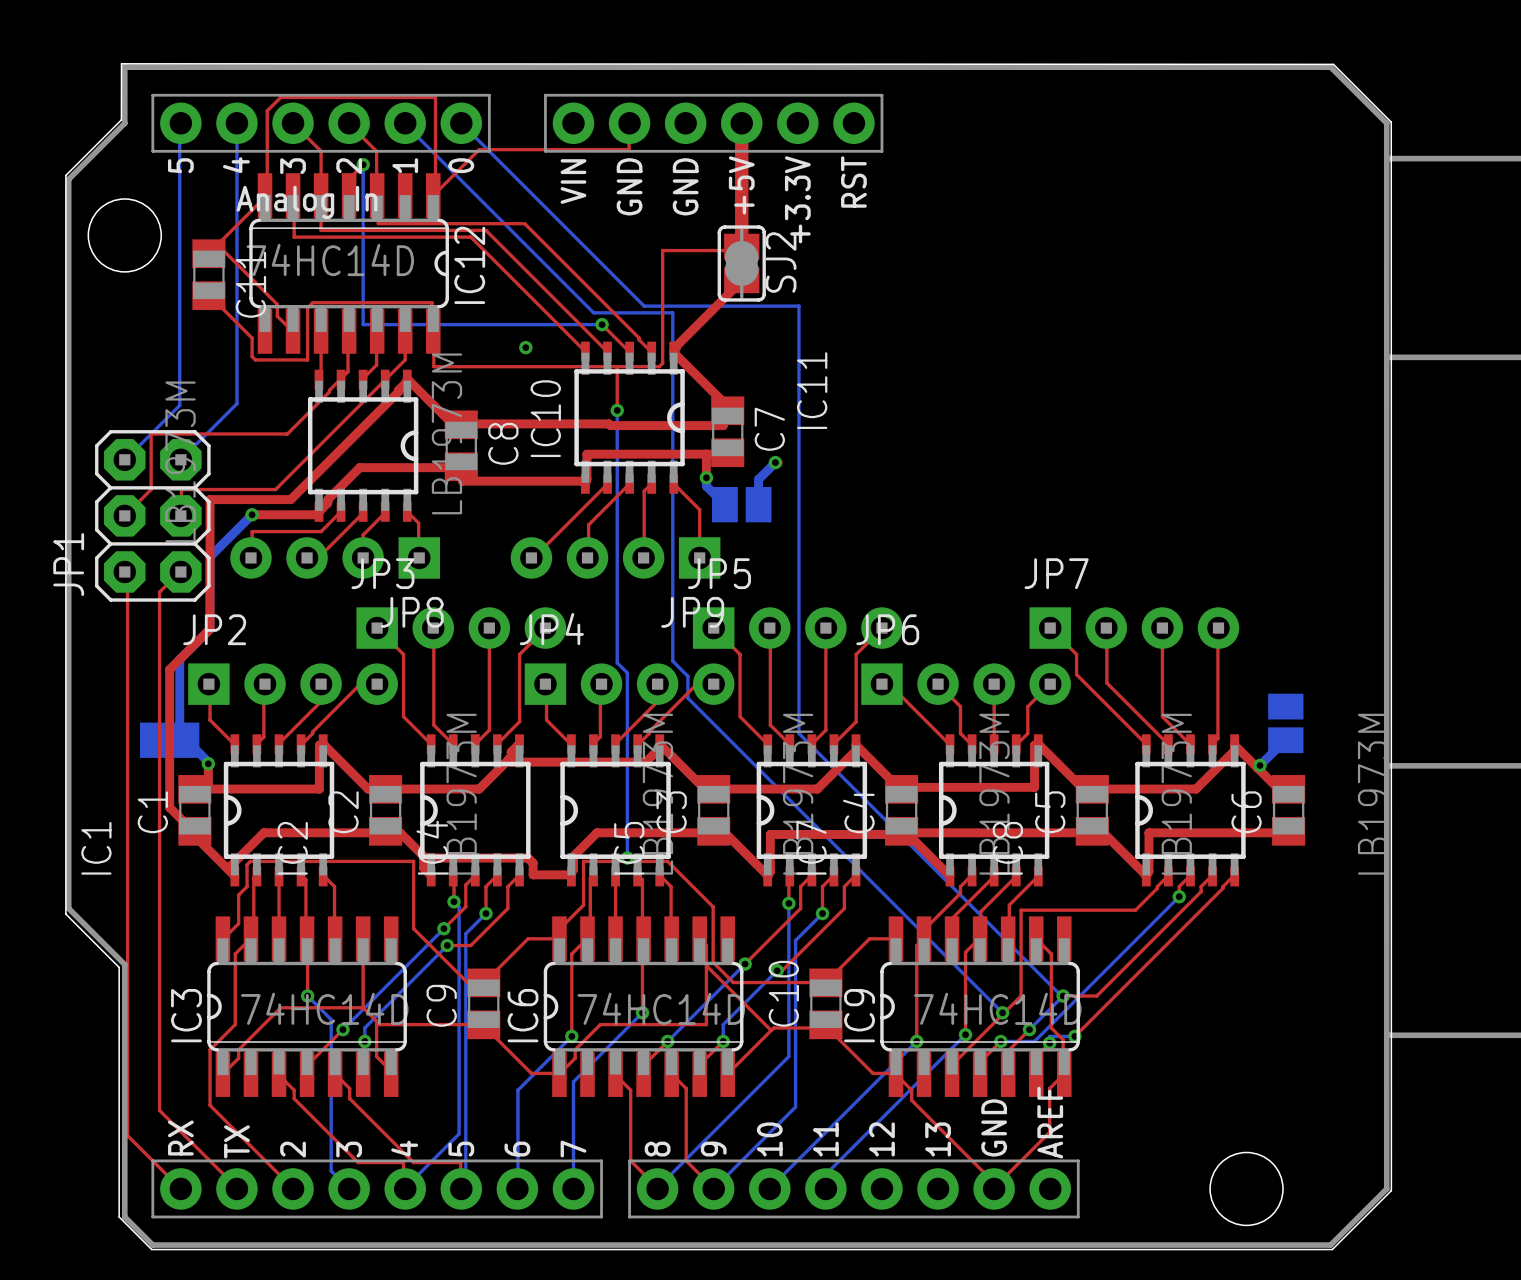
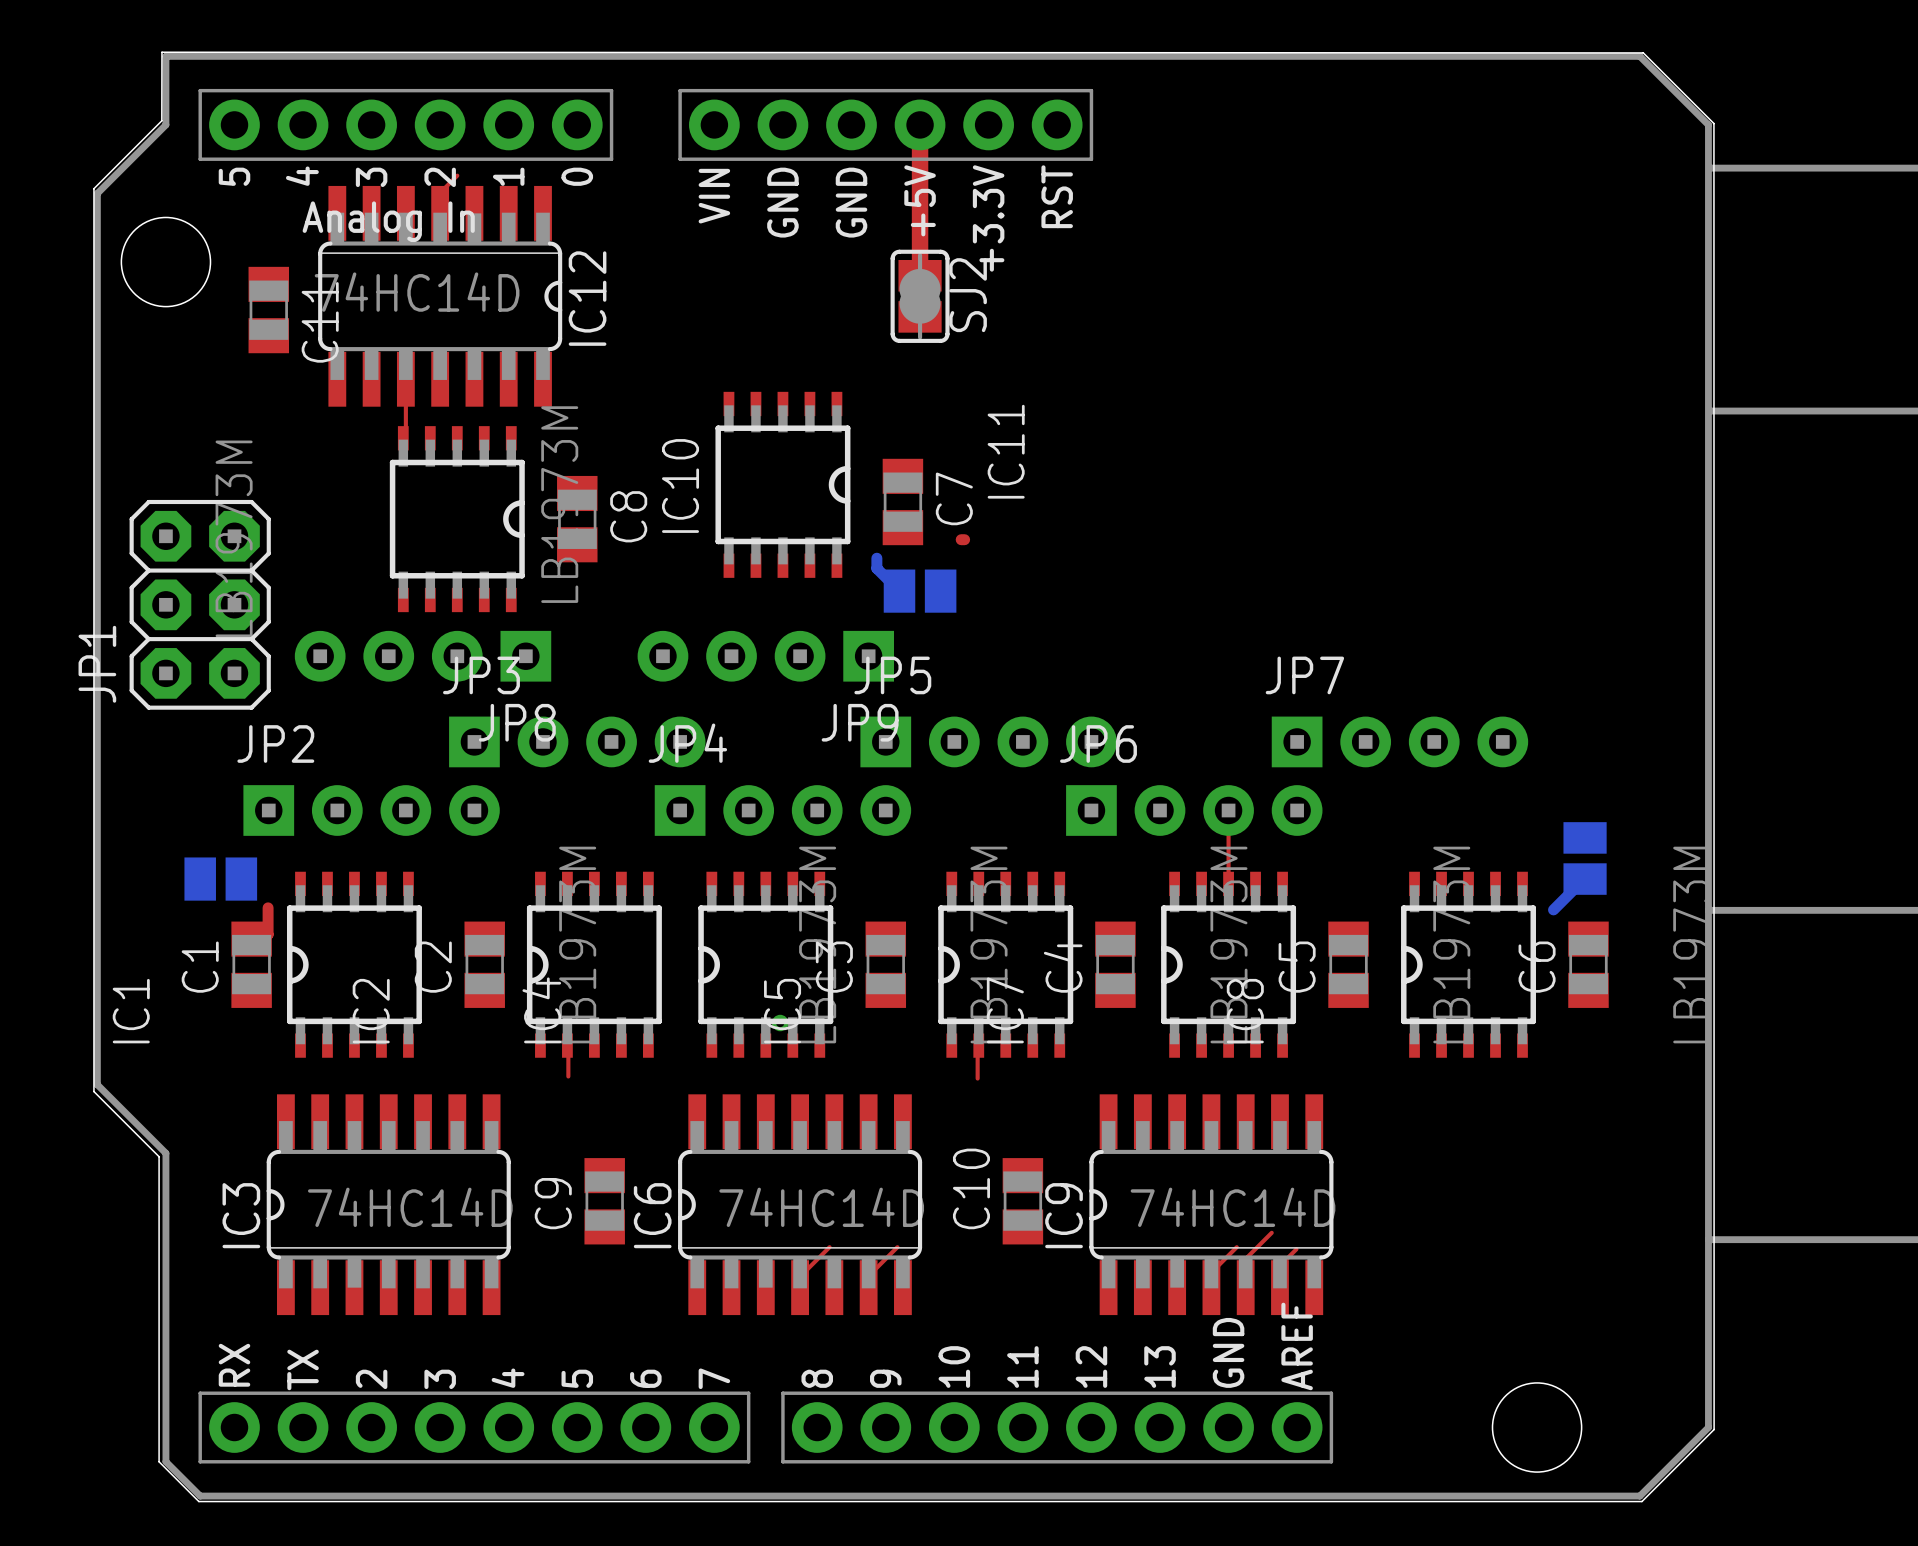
bottom track: (180, 123) (179, 405) (124, 459) -> none
bottom track: (236, 123) (236, 403) (180, 459) -> none
top track: (293, 123) (321, 151) (321, 230) (485, 230) (607, 351) -> none
top track: (349, 123) (376, 151) (378, 223) (524, 223) (651, 351) -> none
bottom track: (405, 123) (593, 312) (672, 312) (672, 661) (687, 676) (687, 698) (1002, 1012) -> none
bottom track: (461, 123) (644, 306) (798, 306) (798, 733) (1063, 996) (1029, 1029) -> none
top track: (629, 123) (629, 149) (479, 149) (433, 195) (435, 191) (435, 97) (280, 97) (267, 110) (267, 193) (208, 253) (218, 245) (277, 304) (277, 316) (293, 331) -> none
bottom track: (363, 164) (363, 324) (602, 324) -> none
via: (363, 164) -> none
top track: (293, 195) (294, 237) (470, 237) (585, 351) -> none
top track: (741, 246) (736, 250) (662, 250) (662, 363) (659, 366) (433, 366) (432, 302) (312, 302) (307, 307) (307, 359) (255, 359) (252, 356) (252, 338) (208, 295) -> none
top track: (741, 280) (676, 346) (673, 351) (726, 405) (727, 410) (723, 412) (723, 425) (452, 423) (407, 379) (398, 391) (290, 499) (210, 499) (210, 629) (169, 669) (169, 807) (194, 831) (194, 836) (234, 876) -> none
top track: (602, 324) (629, 351) -> none
via: (602, 324) -> none
top track: (349, 331) (348, 371) (287, 434) (151, 434) (151, 489) (124, 515) -> none
top track: (377, 331) (376, 365) (363, 379) -> none
top track: (405, 331) (405, 359) (275, 489) (181, 489) (180, 515) -> none
via: (525, 347) -> none
top track: (617, 366) (617, 410) -> none
bottom track: (617, 410) (617, 662) (627, 672) (627, 858) -> none
via: (617, 410) -> none
top track: (727, 452) (586, 454) (585, 483) -> none
top track: (706, 454) (706, 477) -> none
bottom track: (775, 462) (758, 479) (758, 504) -> none
via: (775, 462) -> none
via: (706, 477) -> none
top track: (585, 483) (581, 481) (462, 481) (461, 466) (359, 467) (327, 499) (327, 502) (316, 514) (252, 514) -> none
top track: (607, 483) (534, 556) (531, 557) -> none
top track: (629, 483) (588, 524) (587, 557) -> none
top track: (651, 483) (644, 491) (643, 557) -> none
top track: (673, 483) (699, 509) (699, 557) -> none
top track: (341, 511) (321, 531) (252, 531) (250, 557) -> none
top track: (363, 511) (319, 556) (307, 557) -> none
top track: (385, 511) (363, 534) (363, 557) -> none
top track: (407, 511) (418, 523) (419, 557) -> none
bottom track: (252, 514) (210, 556) (210, 629) (179, 659) (179, 731) (208, 763) -> none
via: (252, 514) -> none
top track: (124, 571) (127, 573) (127, 1135) (180, 1188) -> none
top track: (180, 571) (159, 592) (159, 1110) (236, 1188) -> none
top track: (377, 628) (403, 654) (403, 716) (431, 744) -> none
top track: (433, 628) (433, 725) (453, 744) -> none
top track: (489, 628) (489, 730) (475, 744) -> none
top track: (545, 628) (519, 654) (519, 721) (497, 744) -> none
top track: (713, 628) (740, 654) (740, 716) (767, 744) -> none
top track: (769, 628) (770, 725) (789, 744) -> none
top track: (825, 628) (825, 730) (811, 744) -> none
top track: (881, 628) (856, 654) (856, 721) (833, 744) -> none
top track: (1050, 628) (1076, 654) (1076, 674) (1146, 744) -> none
top track: (1106, 628) (1106, 683) (1168, 744) -> none
top track: (1162, 628) (1162, 716) (1190, 744) -> none
top track: (1218, 628) (1217, 738) (1212, 744) -> none
top track: (208, 684) (210, 720) (234, 744) -> none
top track: (265, 684) (263, 736) (256, 744) -> none
top track: (321, 684) (321, 701) (279, 744) -> none
top track: (377, 684) (359, 684) (301, 744) -> none
top track: (545, 684) (546, 720) (571, 744) -> none
top track: (601, 684) (600, 736) (593, 744) -> none
top track: (657, 684) (657, 701) (615, 744) -> none
top track: (713, 684) (696, 684) (637, 744) -> none
top track: (881, 684) (889, 684) (949, 744) -> none
top track: (938, 684) (960, 706) (960, 733) (972, 744) -> none
top track: (1050, 684) (1027, 706) (1027, 733) (1016, 744) -> none
top track: (519, 744) (511, 752) (511, 757) (479, 789) (368, 789) (323, 744) (319, 745) (319, 789) (194, 789) -> none
top track: (508, 759) (511, 762) (645, 762) (659, 748) (659, 744) (704, 789) (817, 789) (856, 750) (856, 744) (901, 790) (904, 787) (1034, 787) (1034, 745) (1038, 744) (1083, 789) (1196, 789) (1234, 750) (1234, 744) (1278, 789) (1288, 789) -> none
via: (208, 763) -> none
via: (1260, 765) -> none
top track: (901, 831) (906, 832) (949, 876) -> none
top track: (901, 831) (898, 834) (770, 834) (770, 871) (767, 876) (724, 832) (713, 831) (597, 832) (573, 856) (571, 876) (570, 874) (533, 874) (533, 863) (528, 858) (423, 858) -> none
top track: (901, 831) (1103, 832) (1146, 876) (1148, 871) (1148, 832) (1288, 831) -> none
top track: (227, 868) (263, 832) (385, 831) (400, 832) (423, 856) (423, 868) (431, 876) -> none
top track: (256, 876) (253, 878) (253, 937) (235, 953) (235, 1024) (210, 1049) (210, 1105) (293, 1188) -> none
top track: (279, 876) (279, 938) -> none
top track: (301, 876) (305, 879) (307, 996) -> none
top track: (323, 876) (334, 886) (335, 938) -> none
top track: (475, 876) (465, 884) (465, 906) (443, 928) -> none
top track: (497, 876) (485, 886) (485, 913) -> none
top track: (519, 876) (507, 886) (507, 908) (470, 945) (447, 945) -> none
top track: (593, 876) (590, 878) (590, 937) (571, 953) (571, 1036) -> none
top track: (615, 876) (615, 938) -> none
top track: (637, 876) (642, 879) (642, 1012) -> none
top track: (659, 876) (671, 886) (671, 938) -> none
top track: (811, 876) (800, 886) (800, 908) (745, 964) -> none
top track: (833, 876) (822, 886) (822, 913) -> none
top track: (856, 876) (844, 886) (844, 908) (782, 970) (777, 970) -> none
top track: (972, 876) (960, 886) (960, 893) (925, 928) (925, 938) (916, 945) (916, 1041) -> none
top track: (994, 876) (952, 918) (952, 938) -> none
top track: (1016, 876) (980, 911) (980, 938) (965, 952) (965, 1034) -> none
top track: (1037, 876) (1009, 905) (1008, 938) -> none
top track: (1168, 876) (1135, 910) (1021, 910) (1021, 996) (952, 1064) (952, 1074) -> none
top track: (1190, 876) (1179, 886) (1179, 896) -> none
top track: (1212, 876) (1201, 886) (1201, 891) (1096, 996) (1063, 996) -> none
top track: (1234, 876) (1074, 1036) -> none
bottom track: (1179, 896) (1034, 1041) (1000, 1041) -> none
via: (1179, 896) -> none
bottom track: (454, 901) (459, 906) (459, 1133) (405, 1188) -> none
via: (454, 901) -> none
bottom track: (788, 903) (788, 1056) (657, 1188) -> none
via: (788, 903) -> none
bottom track: (485, 913) (465, 933) (465, 1184) (461, 1188) -> none
via: (485, 913) -> none
bottom track: (822, 913) (795, 940) (795, 1107) (713, 1188) -> none
via: (822, 913) -> none
bottom track: (443, 928) (342, 1029) -> none
via: (443, 928) -> none
top track: (222, 938) (238, 923) (238, 895) (247, 886) (247, 864) (250, 861) (413, 861) (413, 928) (467, 982) (484, 982) (528, 938) (560, 938) (560, 928) (583, 905) (583, 861) (667, 861) (713, 906) (713, 962) (733, 982) (825, 982) (869, 938) (895, 938) -> none
top track: (363, 938) (363, 1007) -> none
top track: (699, 938) (706, 945) (706, 965) (771, 1030) -> none
top track: (1036, 938) (1051, 953) (1051, 1027) (1063, 1039) (1064, 1074) (1049, 1088) (1049, 1132) (994, 1188) (995, 1184) (911, 1100) (911, 1090) (894, 1073) (873, 1073) (825, 1026) -> none
bottom track: (447, 945) (364, 1027) (364, 1041) -> none
via: (447, 945) -> none
bottom track: (745, 964) (667, 1041) -> none
via: (745, 964) -> none
top track: (707, 966) (706, 1024) (600, 1024) (575, 1049) (575, 1058) (559, 1074) (531, 1073) (483, 1024) (376, 1024) -> none
bottom track: (777, 970) (723, 1024) (723, 1041) -> none
via: (777, 970) -> none
bottom track: (307, 996) (331, 1019) (331, 1171) (349, 1188) -> none
via: (307, 996) -> none
via: (1063, 996) -> none
top track: (363, 1007) (280, 1007) (238, 1049) (238, 1058) (222, 1074) -> none
top track: (363, 1007) (376, 1021) (376, 1056) (391, 1073) -> none
bottom track: (642, 1012) (573, 1081) (573, 1188) -> none
via: (642, 1012) -> none
via: (1002, 1012) -> none
top track: (825, 1024) (825, 1027) (773, 1027) (727, 1074) -> none
top track: (342, 1029) (307, 1064) (307, 1074) -> none
via: (342, 1029) -> none
via: (1029, 1029) -> none
bottom track: (965, 1034) (825, 1174) (825, 1188) -> none
via: (965, 1034) -> none
bottom track: (571, 1036) (517, 1090) (517, 1188) -> none
via: (571, 1036) -> none
bottom track: (1074, 1036) (1049, 1036) (1049, 1043) -> none
via: (1074, 1036) -> none
via: (364, 1041) -> none
via: (667, 1041) -> none
via: (723, 1041) -> none
bottom track: (916, 1041) (769, 1188) -> none
via: (916, 1041) -> none
via: (1000, 1041) -> none
via: (1049, 1043) -> none
top track: (279, 1074) (294, 1090) (294, 1098) (358, 1162) (403, 1162) (403, 1186) (405, 1188) -> none
top track: (335, 1074) (349, 1088) (349, 1098) (413, 1162) (460, 1162) (461, 1188) -> none
top track: (615, 1074) (630, 1090) (630, 1160) (657, 1188) -> none
top track: (671, 1074) (686, 1088) (686, 1160) (713, 1188) -> none

